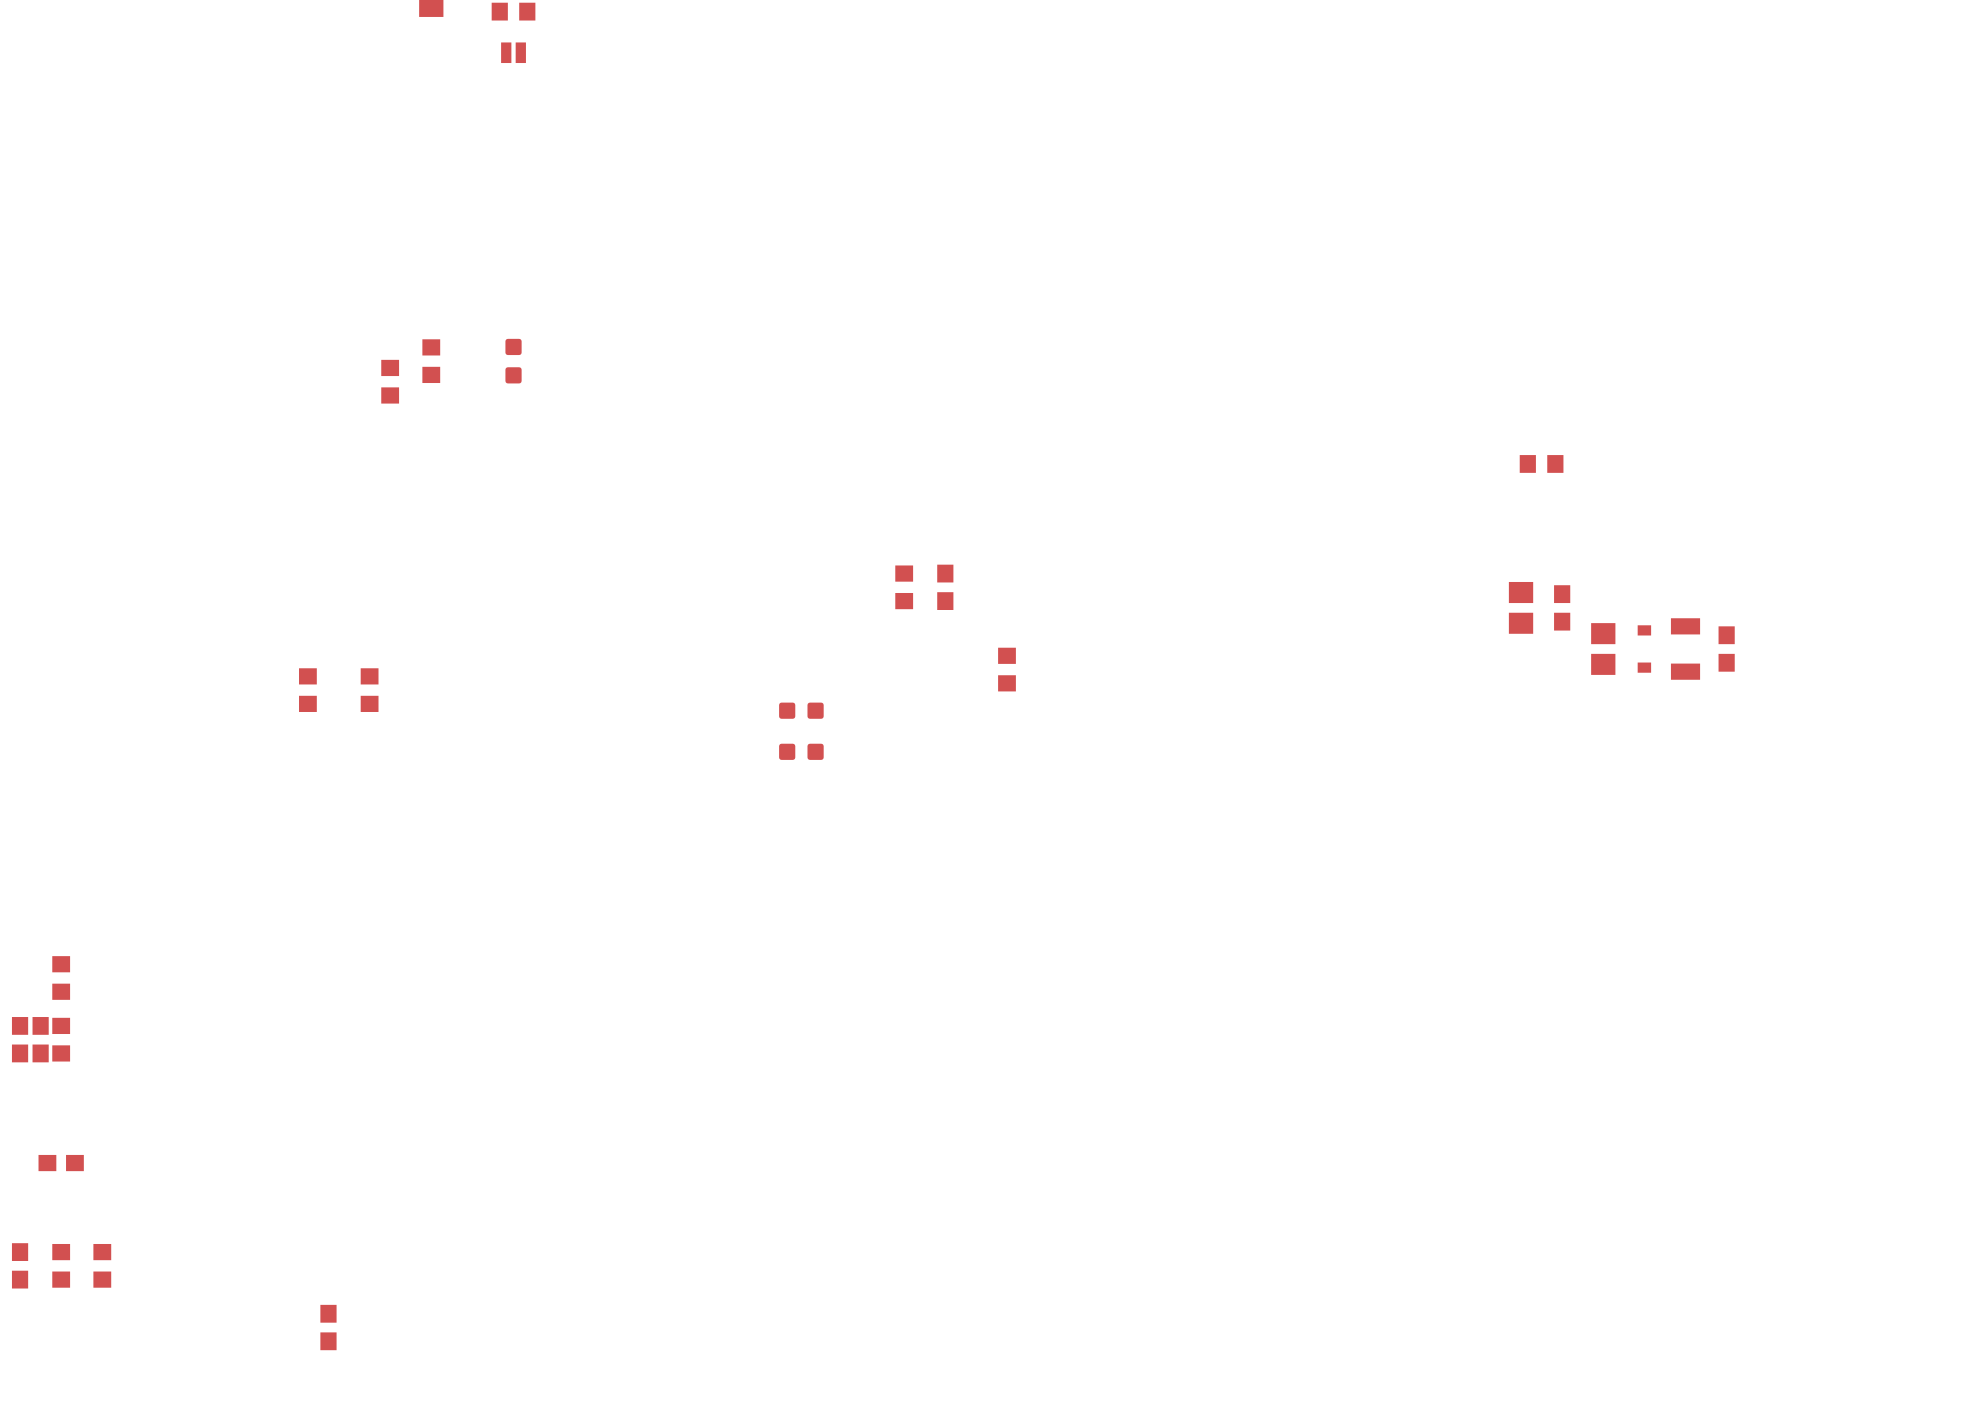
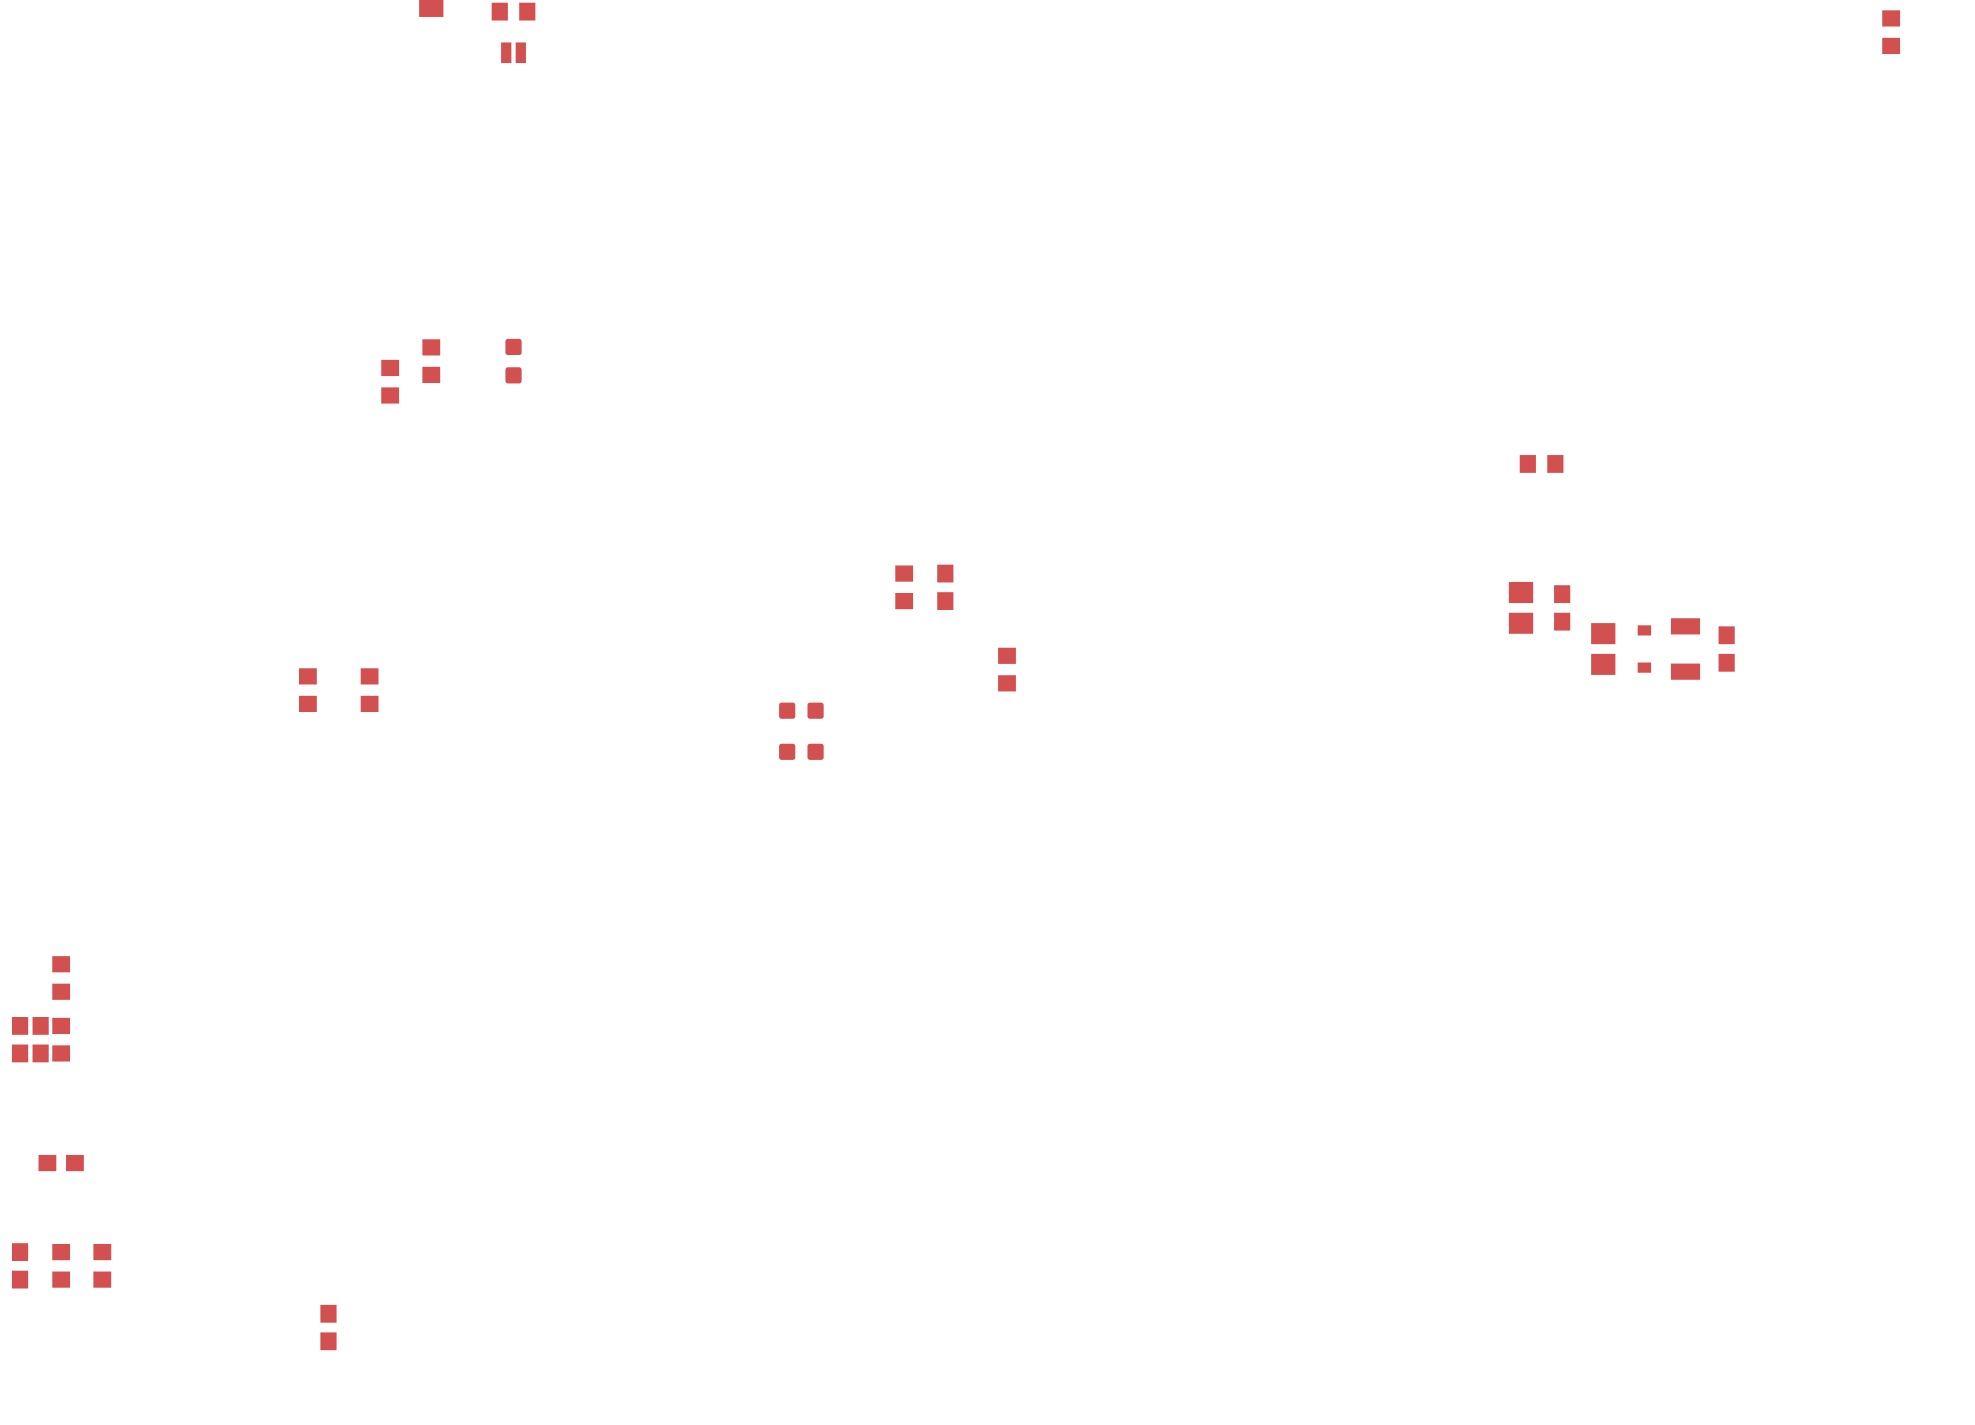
part: none -> (1891, 32)

